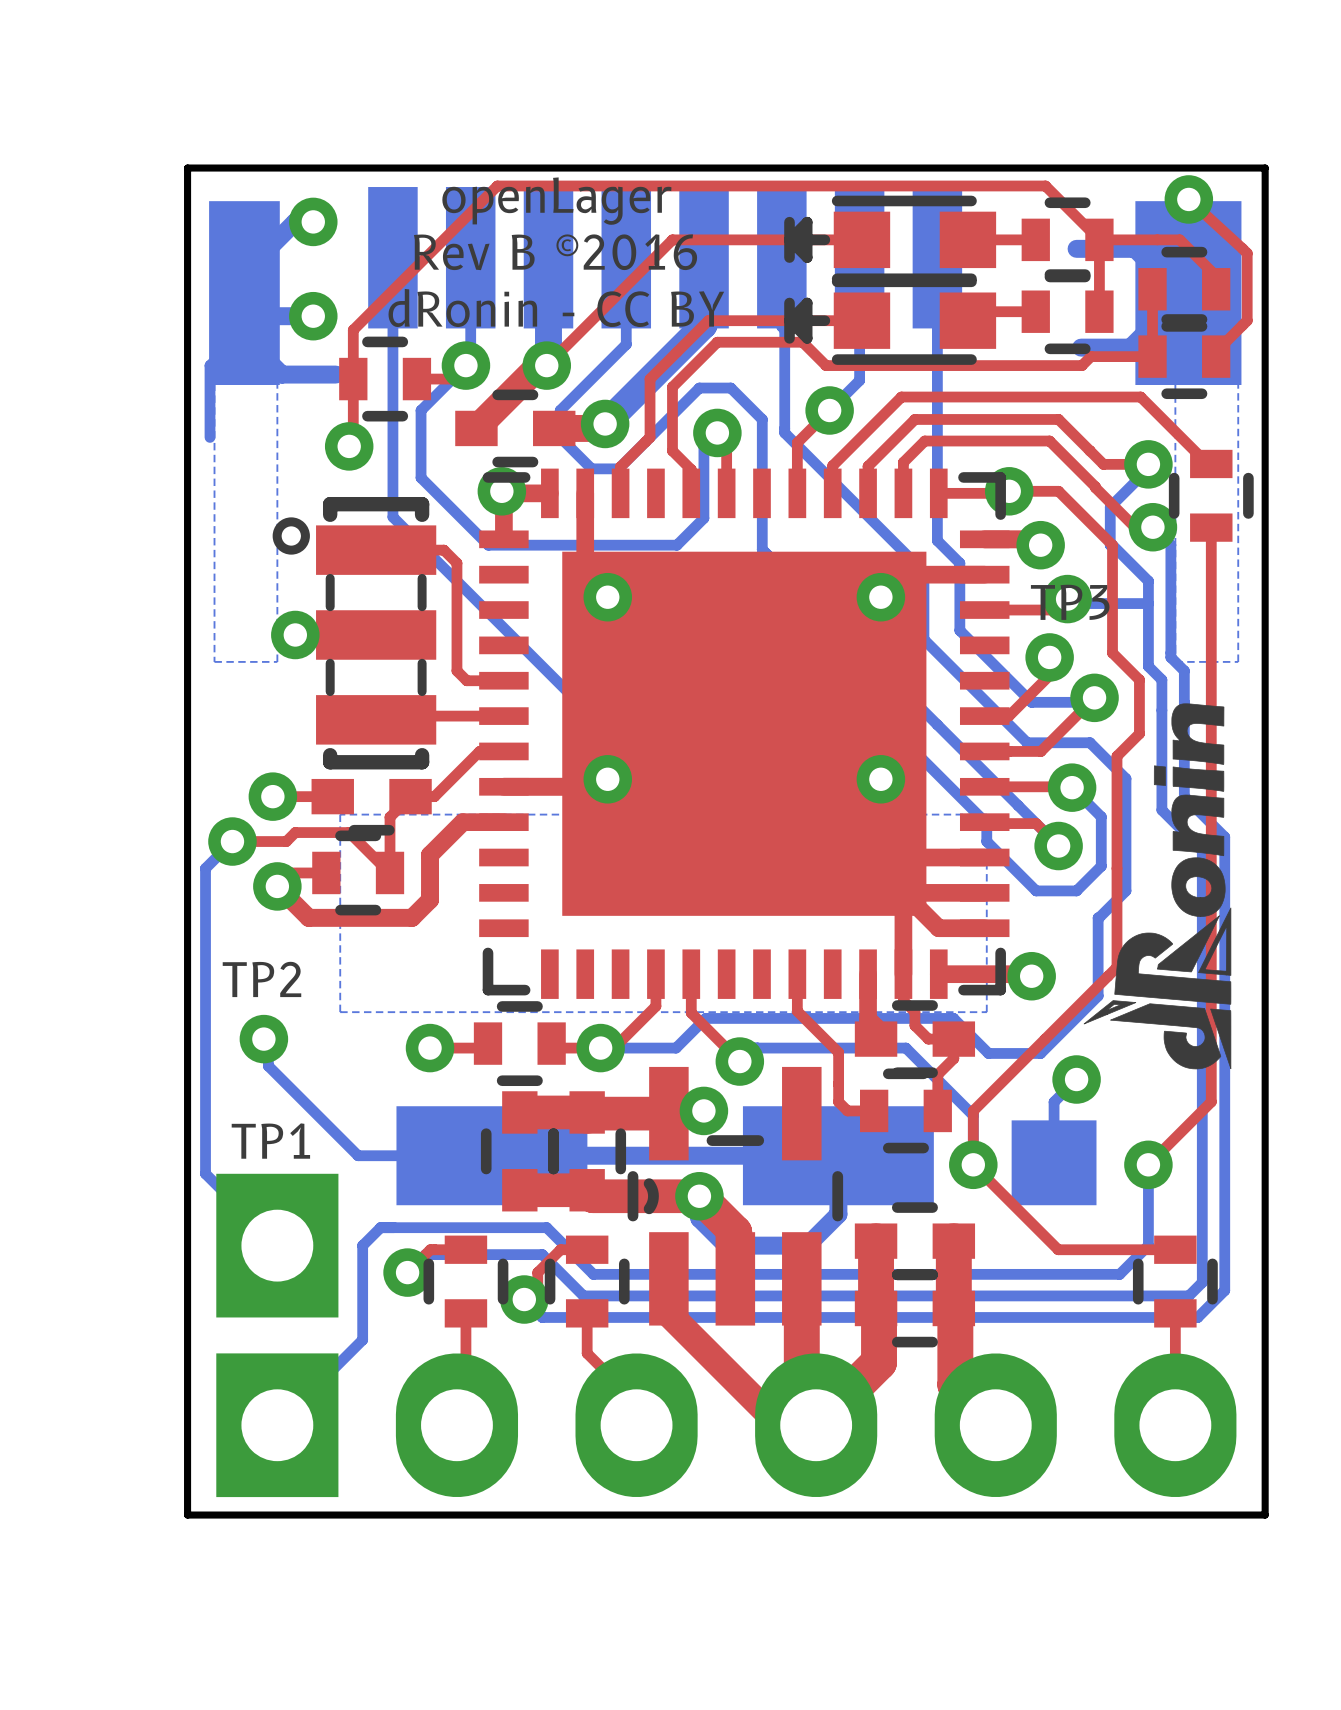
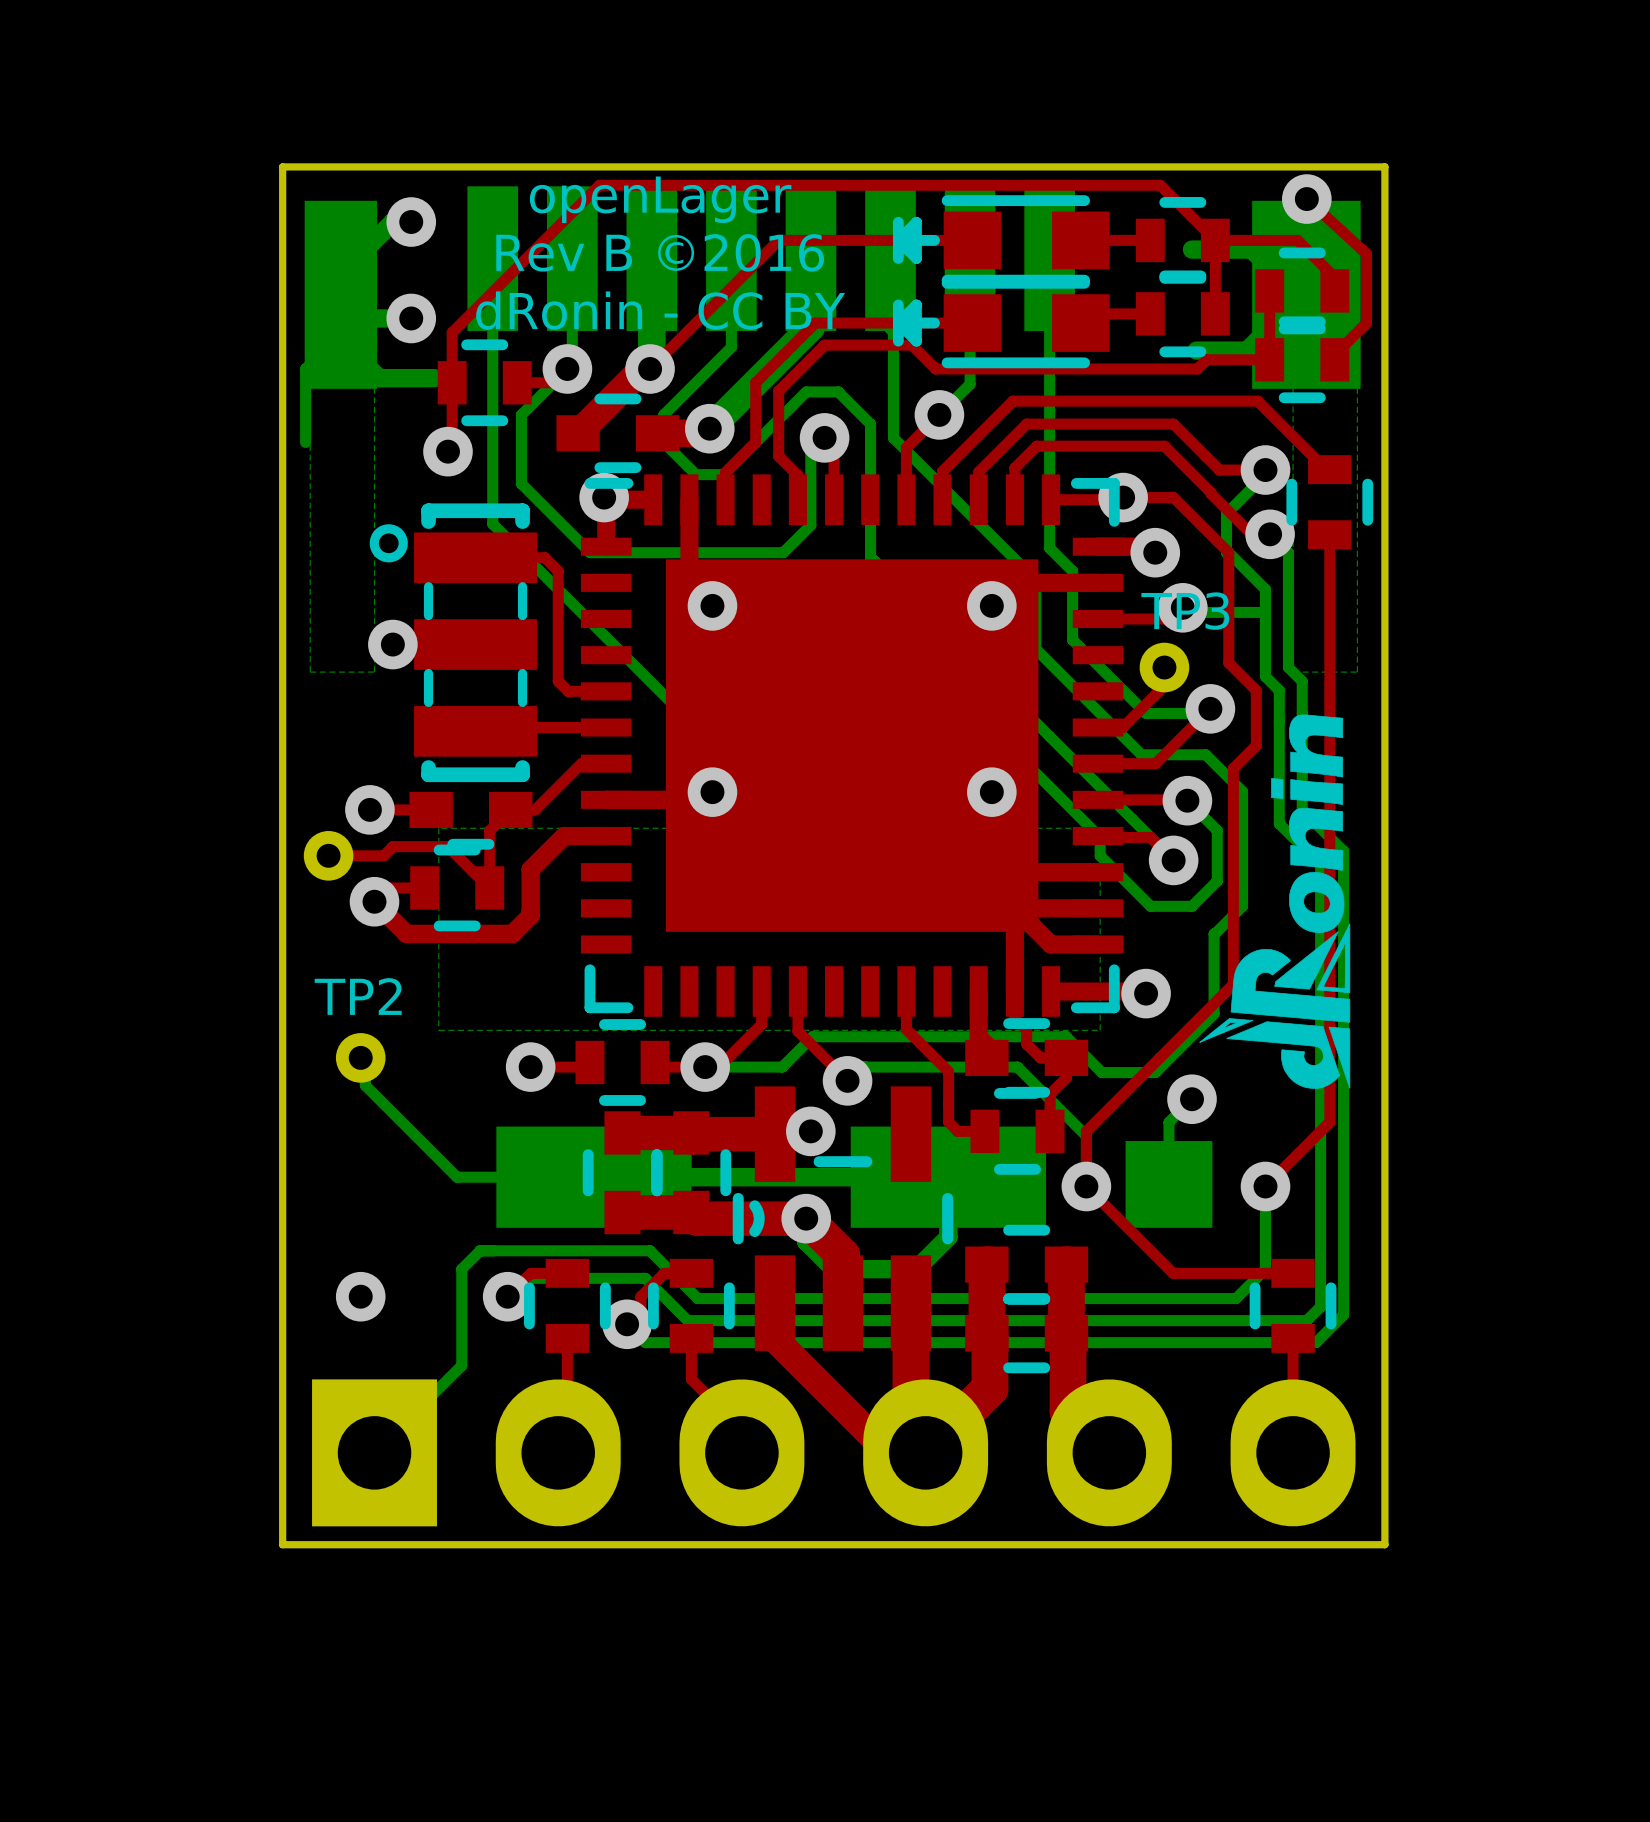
bottom track: (232, 841) (205, 868) (205, 1173) (277, 1245) (295, 1227) -> none
part: none -> (328, 855)
via: (232, 841) -> none
TP1: (277, 1245) -> none
via: none -> (360, 1296)

